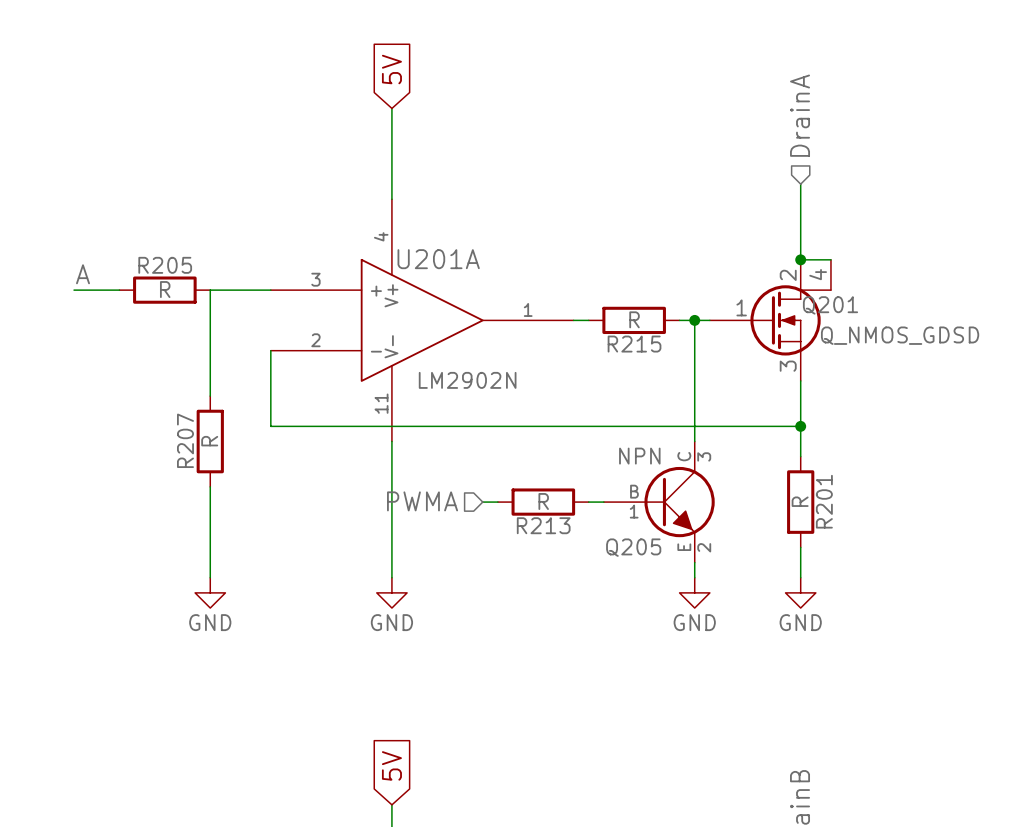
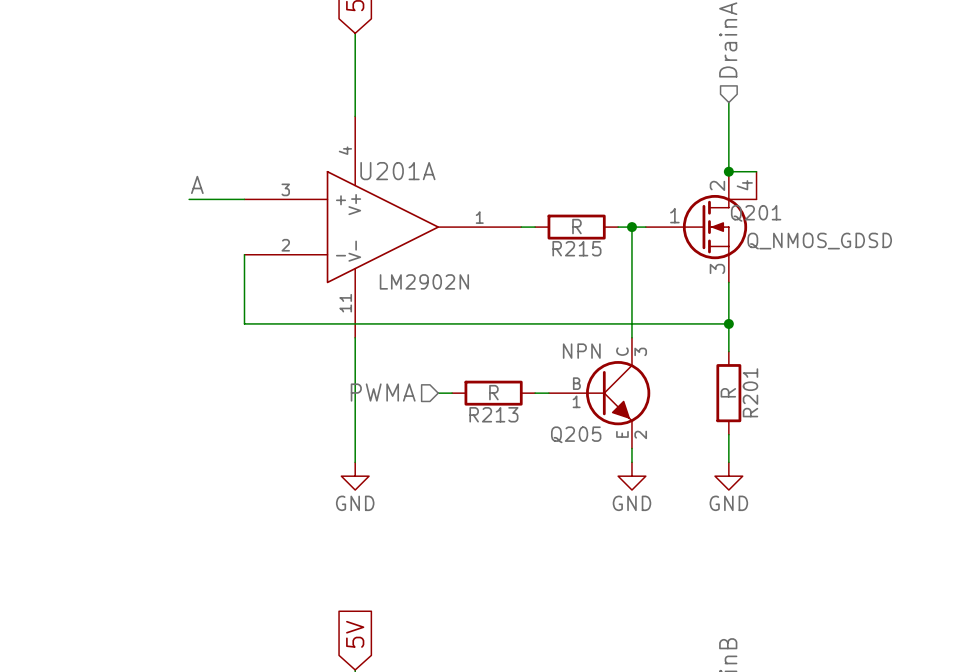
label position: A (83, 274) -> A (197, 184)
wire: (74, 290) (119, 290) -> none
R205: R (164, 290) -> none
wire: (210, 290) (210, 396) -> none
R207: R (210, 441) -> none
wire: (210, 486) (210, 577) -> none
power symbol: GND (210, 592) -> none

